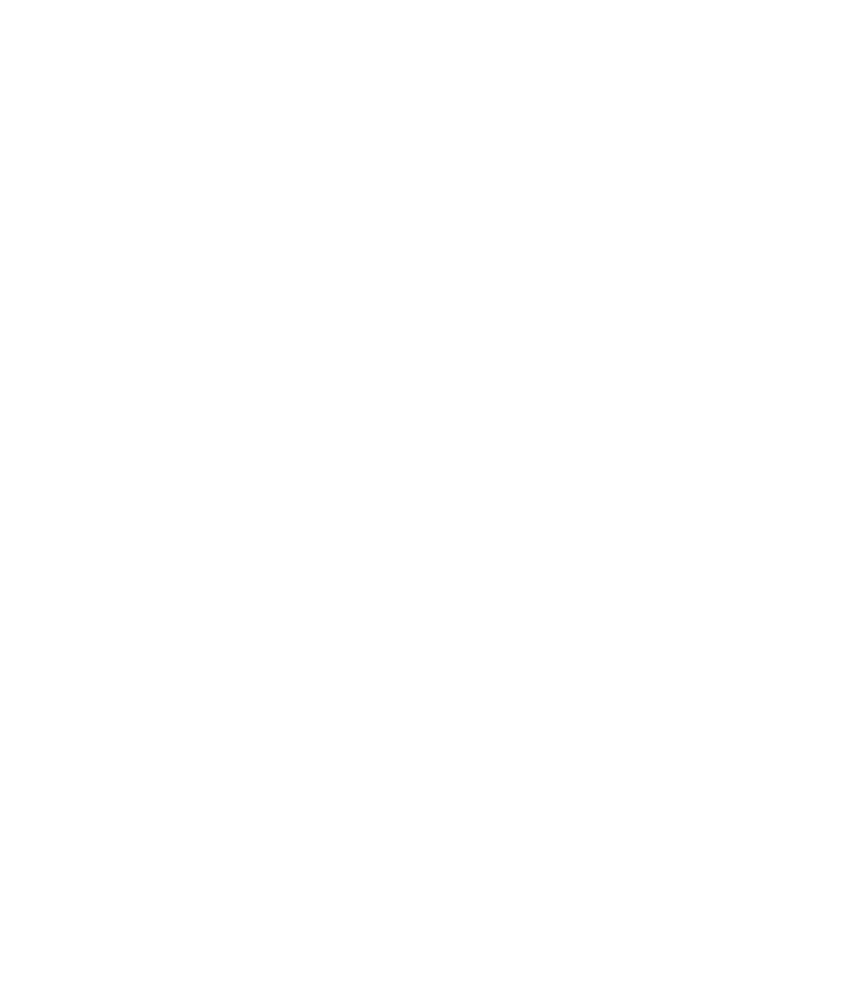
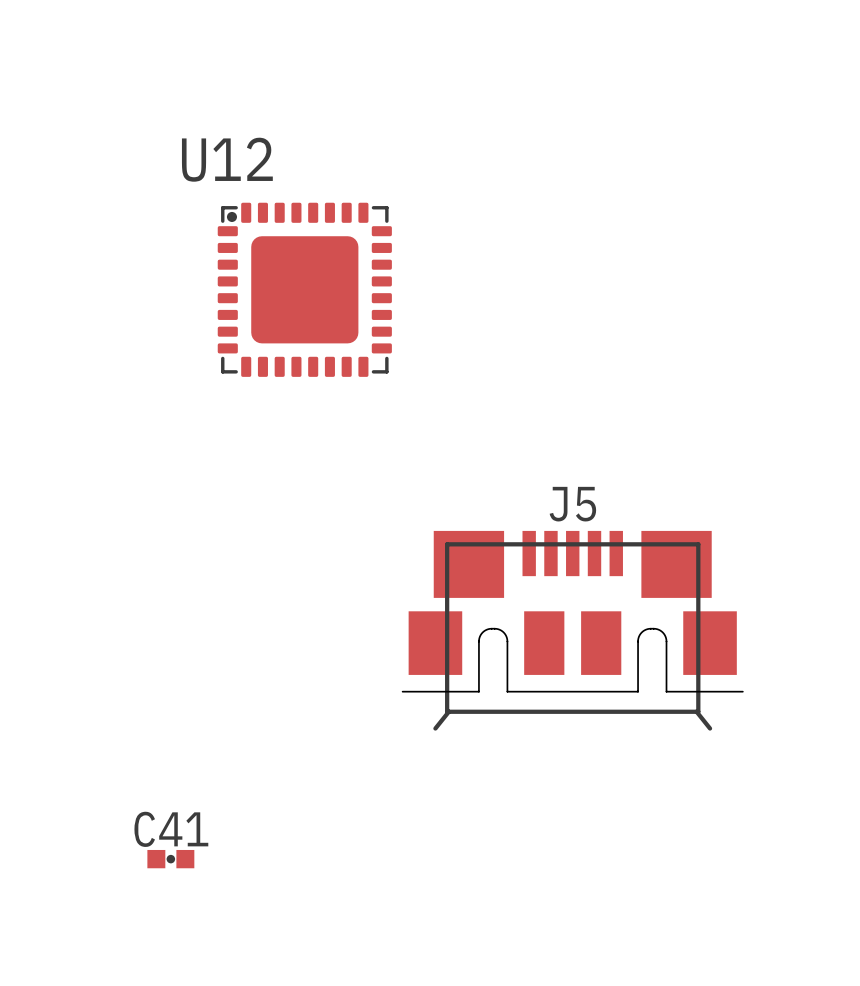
U12: none -> (304, 289)
J5: none -> (572, 630)
C41: none -> (170, 859)

